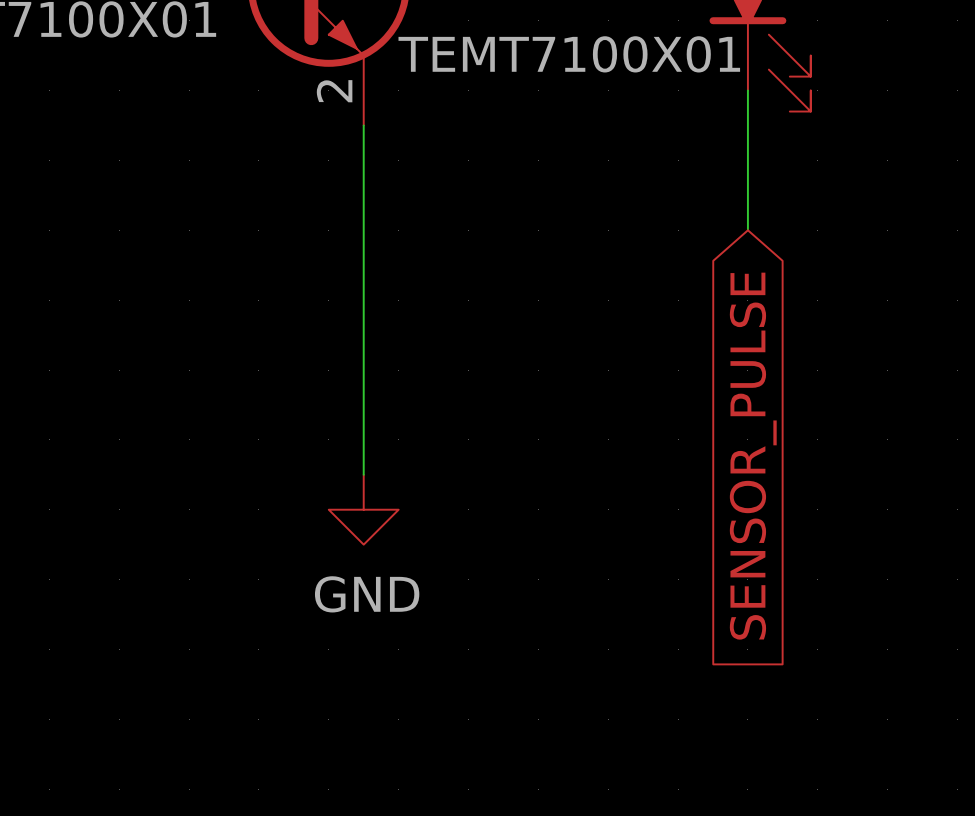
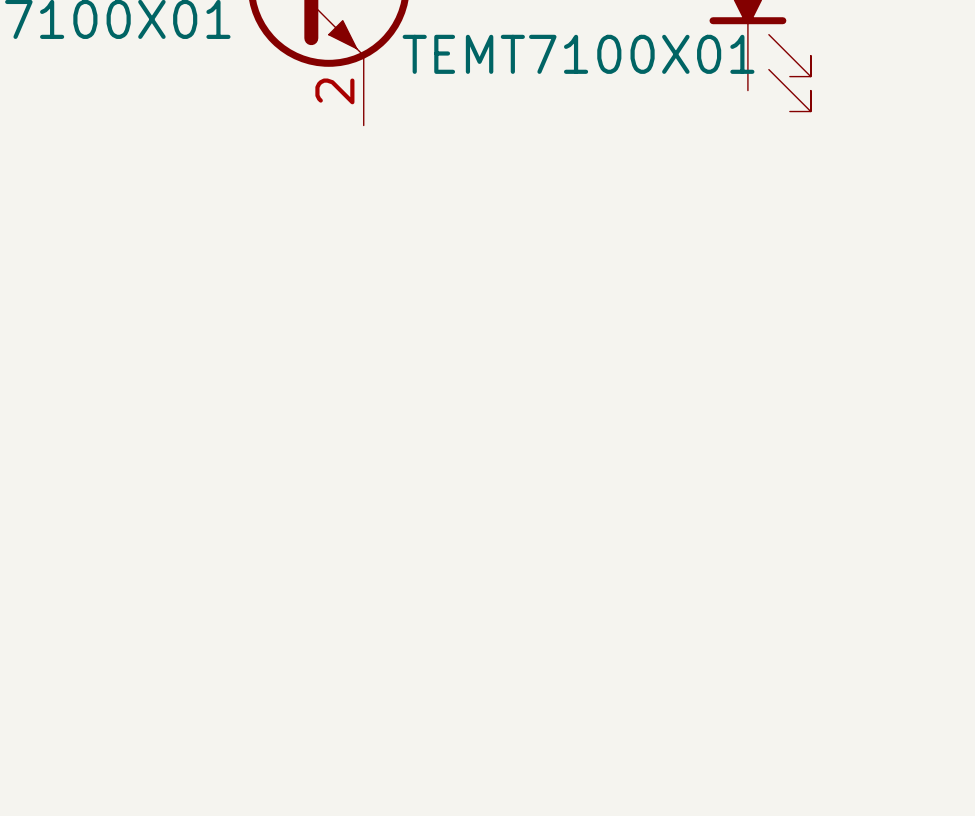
wire: (747, 90) (747, 230) -> none
wire: (363, 125) (363, 474) -> none
global label: SENSOR_PULSE (753, 456) -> none
power symbol: GND (363, 509) -> none

